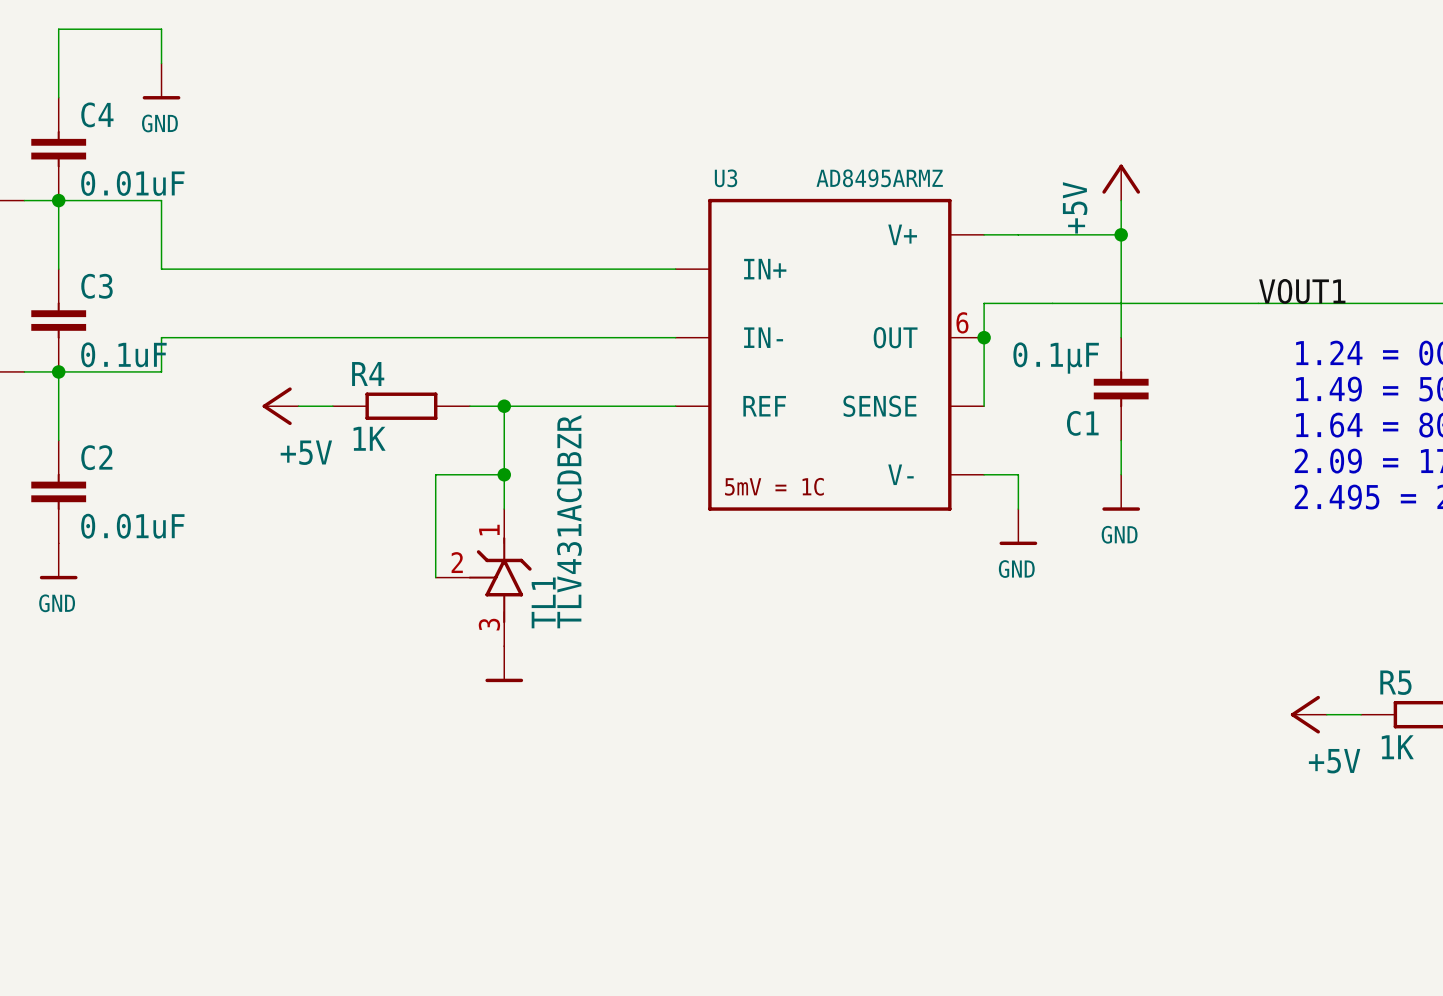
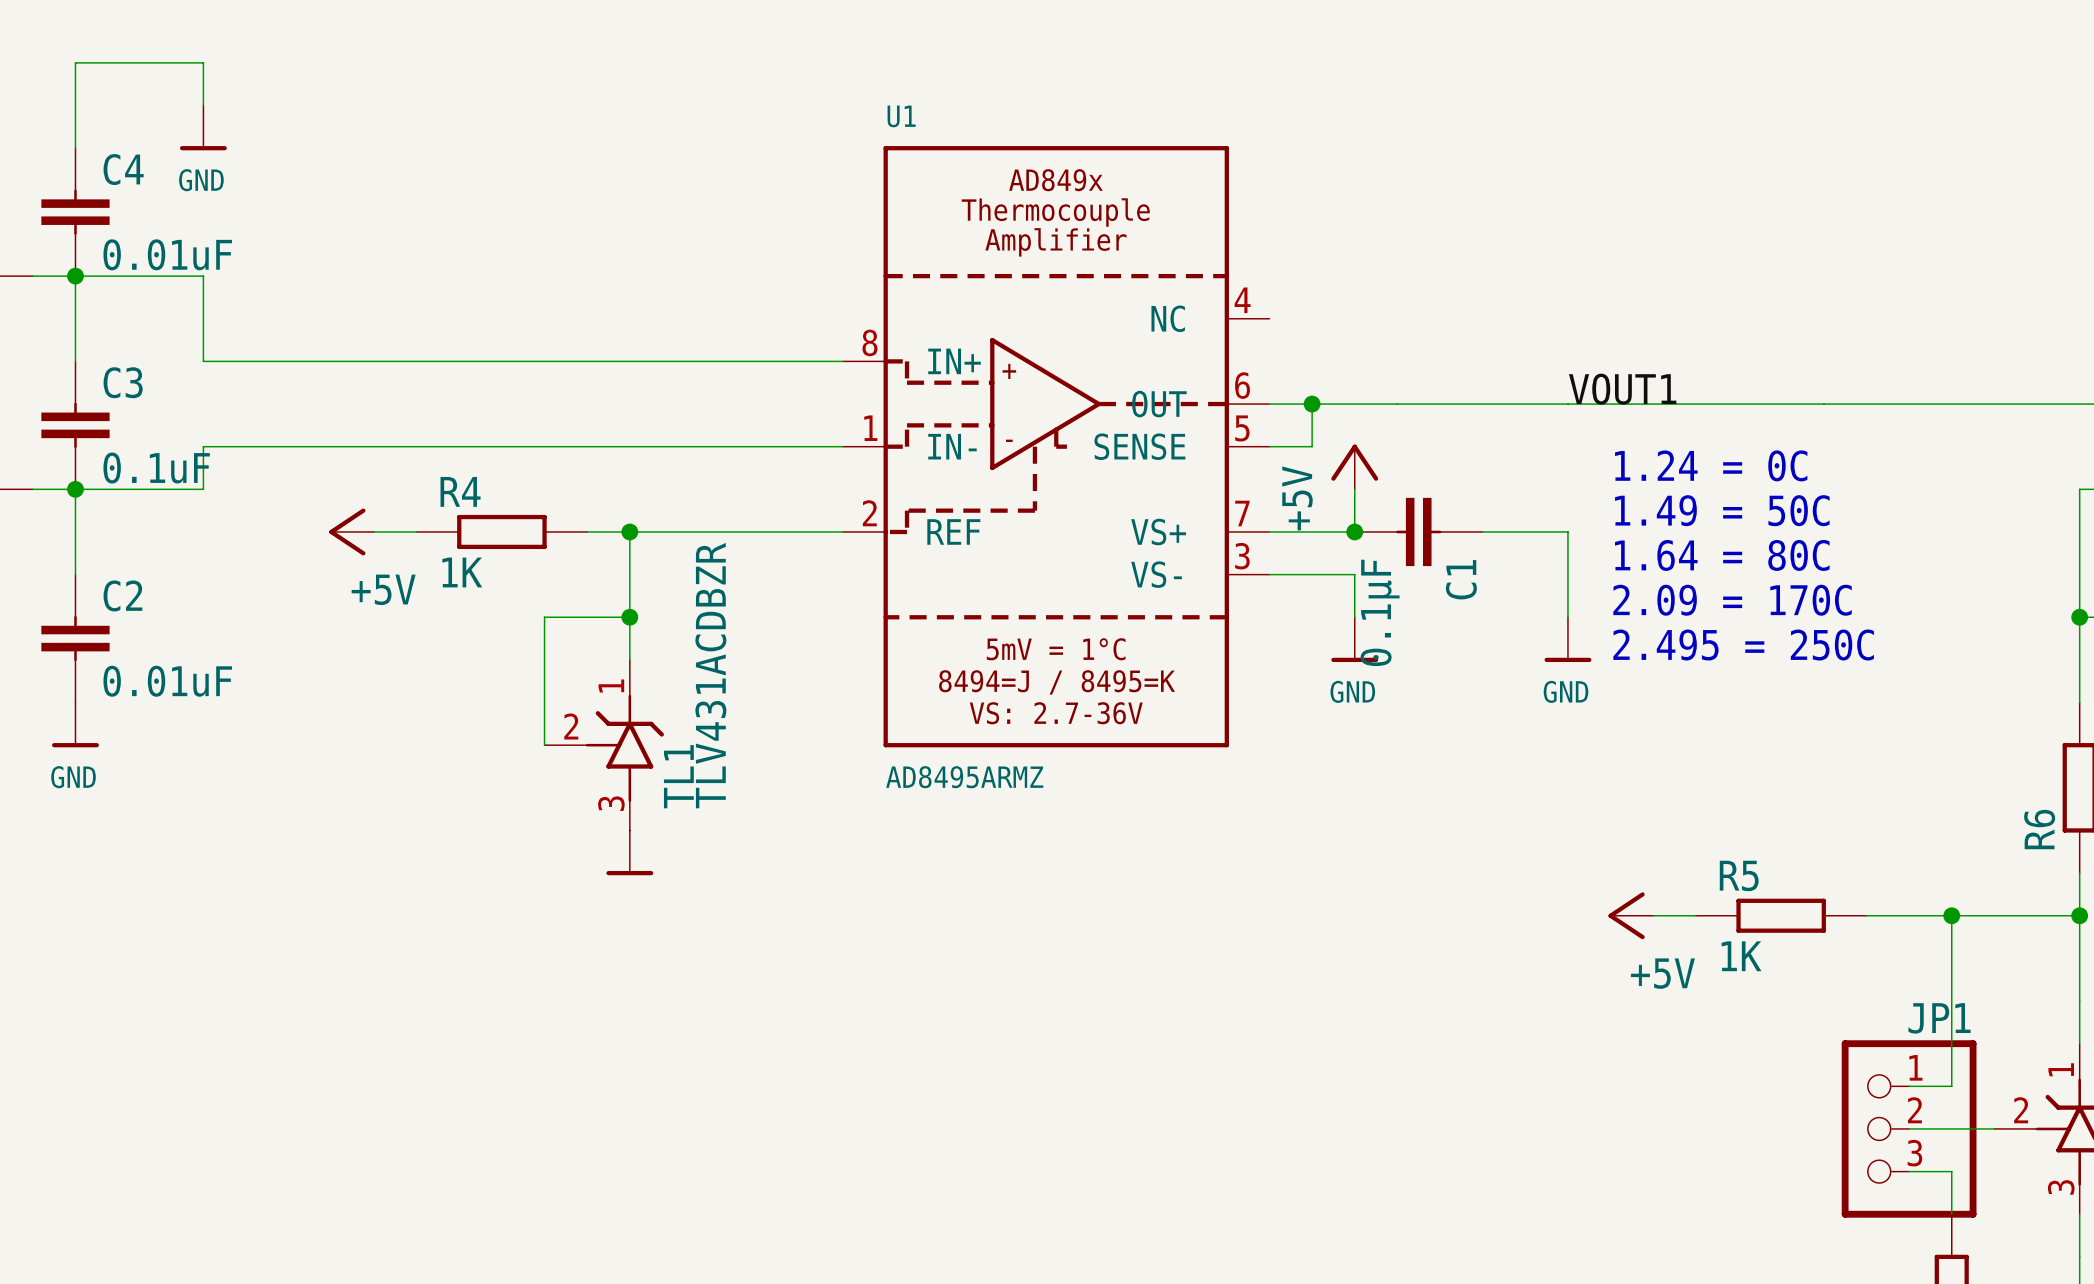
power symbol position: +5V (1121, 182) -> +5V (1354, 466)
wire: (1121, 200) (1121, 337) -> none
wire: (984, 234) (1121, 234) -> none
junction: (1121, 234) -> none
wire: none -> (1312, 404) (1312, 446) (1269, 446)
junction: none -> (1312, 404)
U1: none -> AD8495ARMZ (1056, 446)
junction: (984, 337) -> none
U3: AD8495ARMZ (829, 354) -> none
C1 value position: 0.1µF (1056, 358) -> 0.1µF (1380, 612)
wire: none -> (1354, 489) (1354, 531) (1269, 531)
C1 rotation: 0° (1121, 389) -> 90° clockwise (1418, 531)
junction: none -> (1354, 531)
wire: none -> (1482, 531) (1567, 531) (1567, 617)
C1 name position: C1 (1082, 423) -> C1 (1461, 579)
wire: none -> (1269, 574) (1354, 574) (1354, 617)
wire: (1121, 440) (1121, 474) -> none
wire: (984, 474) (1018, 474) (1018, 509) -> none
power symbol position: GND (1121, 492) -> GND (1354, 639)
power symbol: none -> GND (1567, 639)
power symbol: GND (1018, 527) -> none

